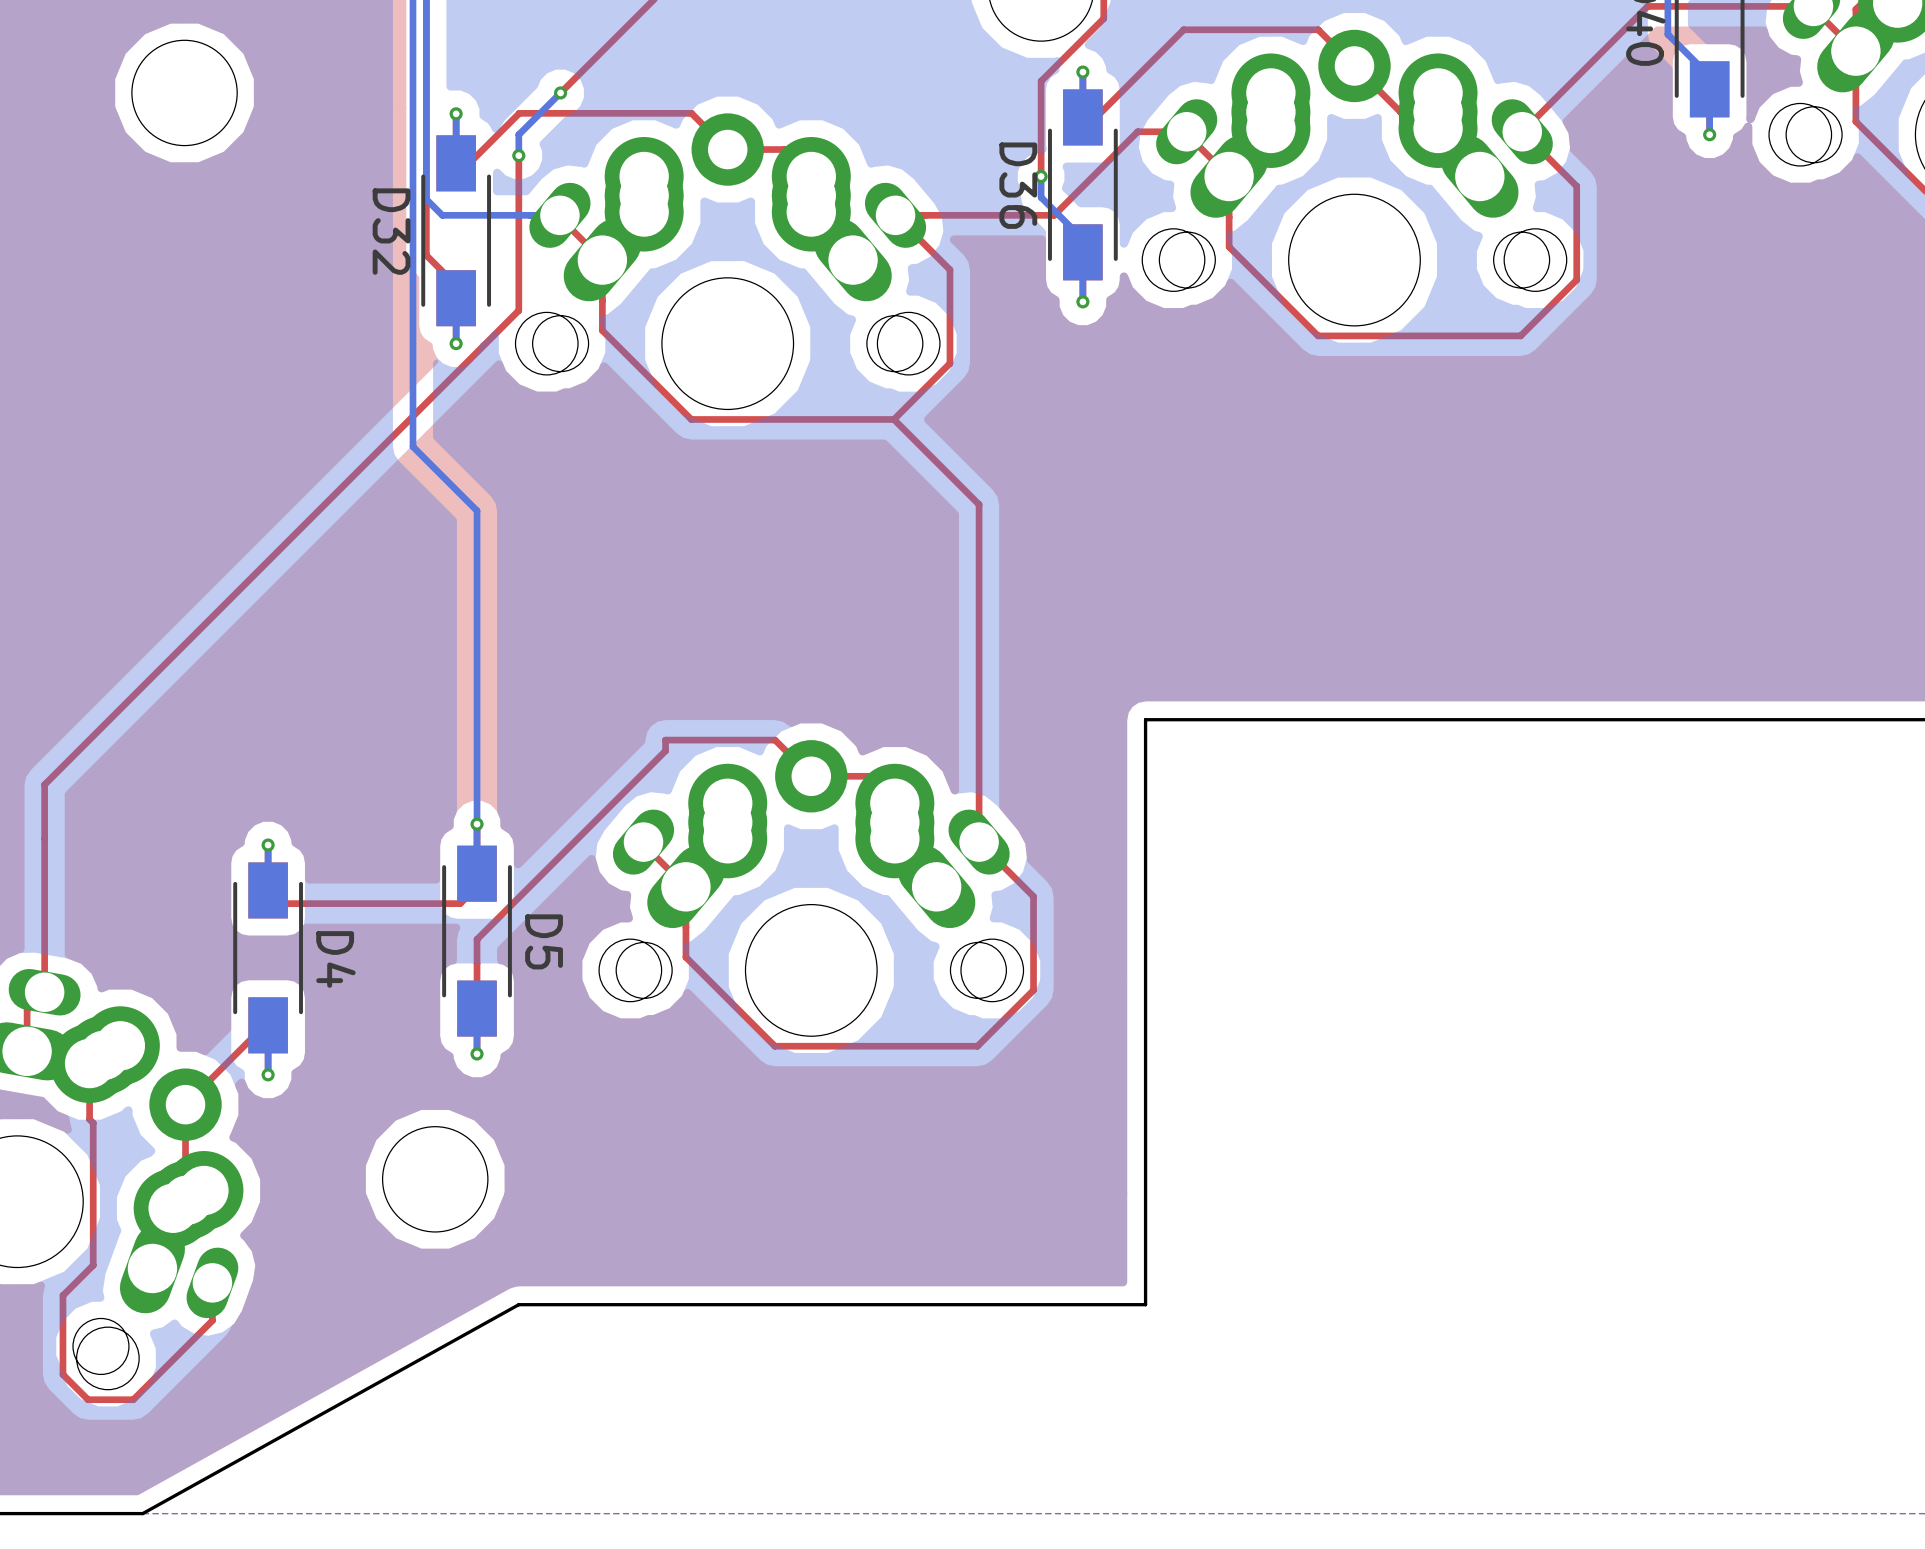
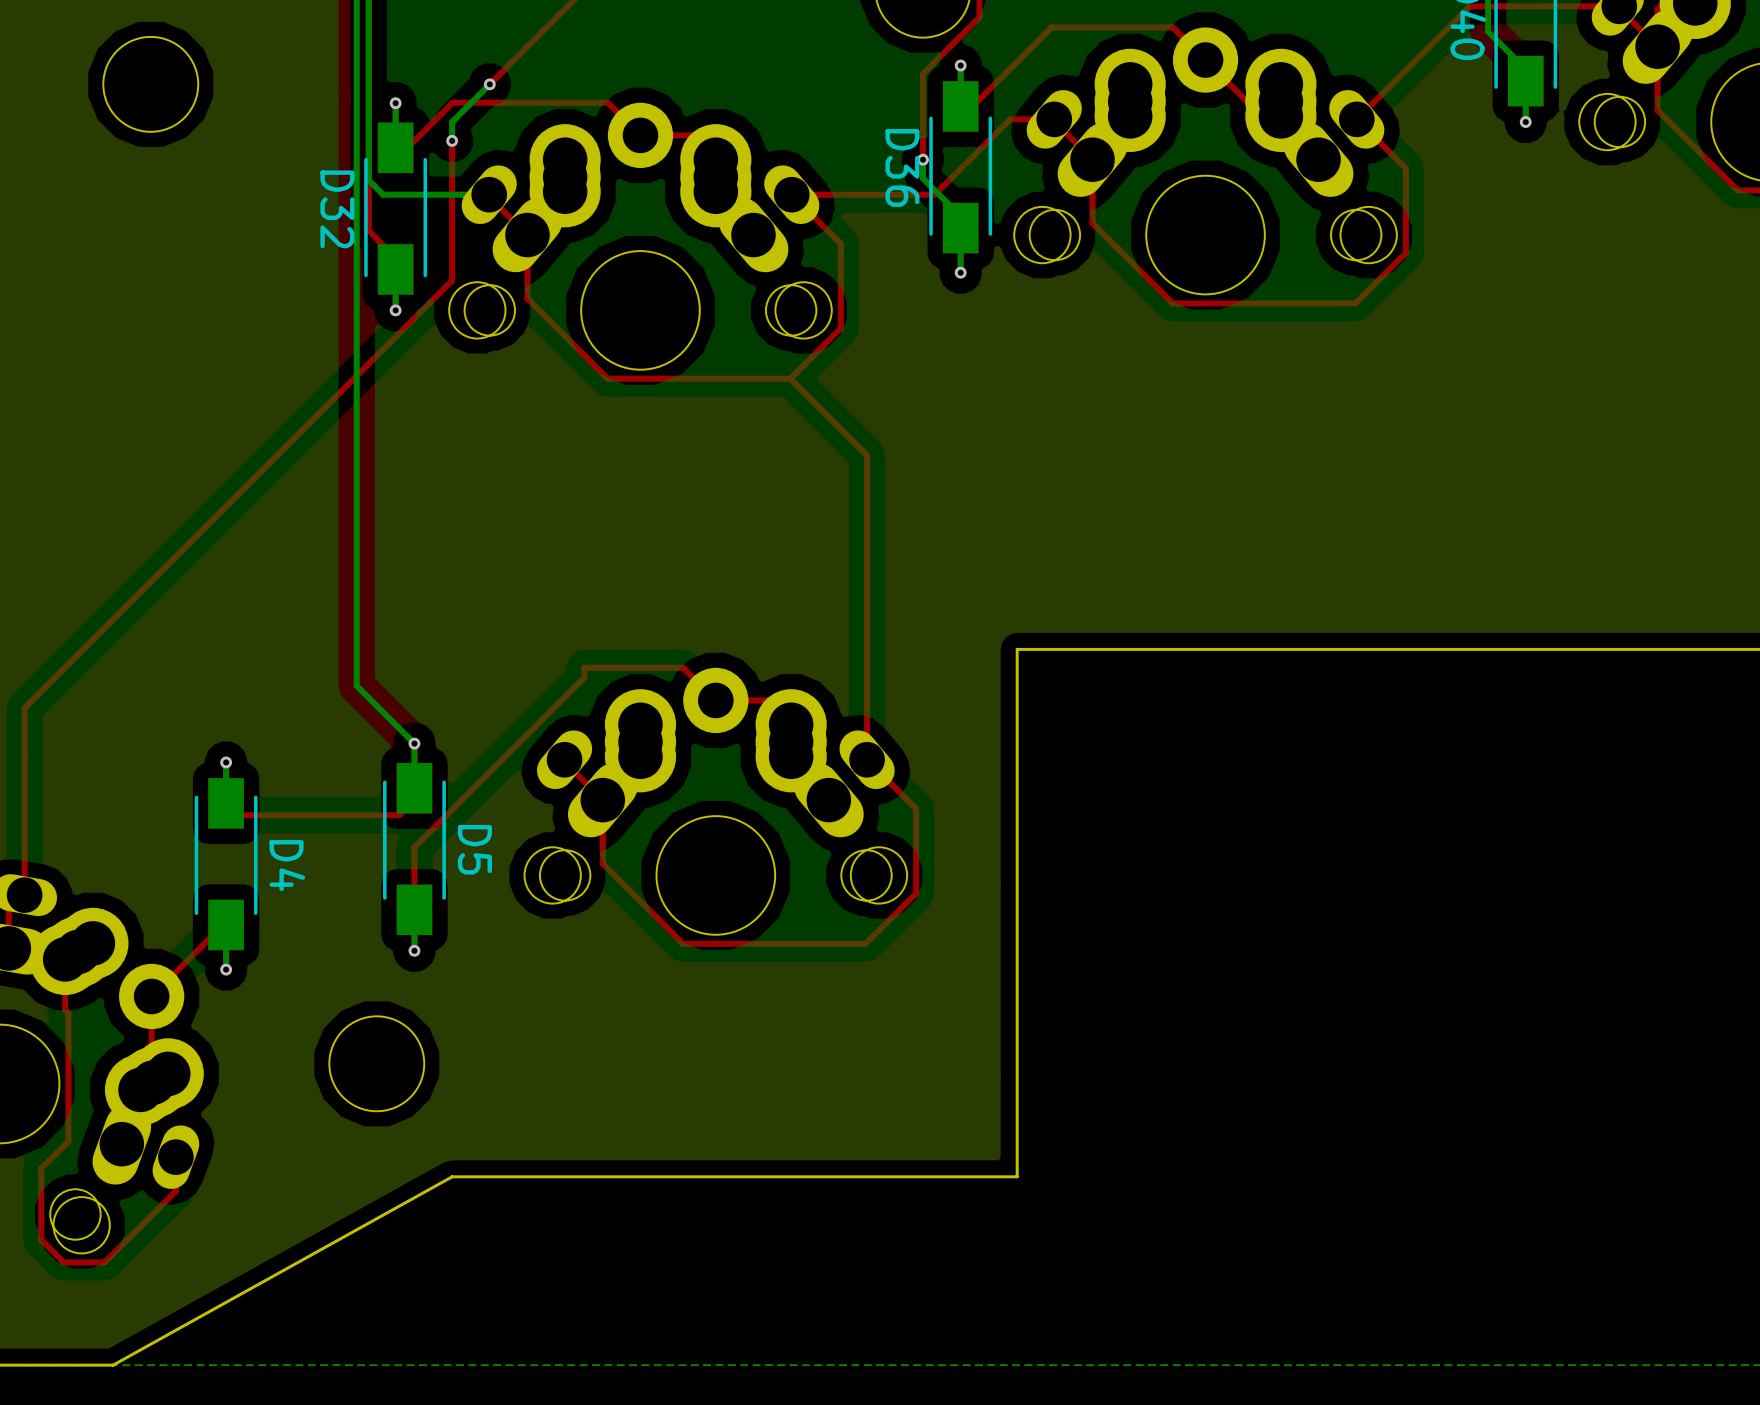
bottom track: (412, 446) (477, 510) (477, 824) -> (356, 403) (356, 685) (414, 743)

